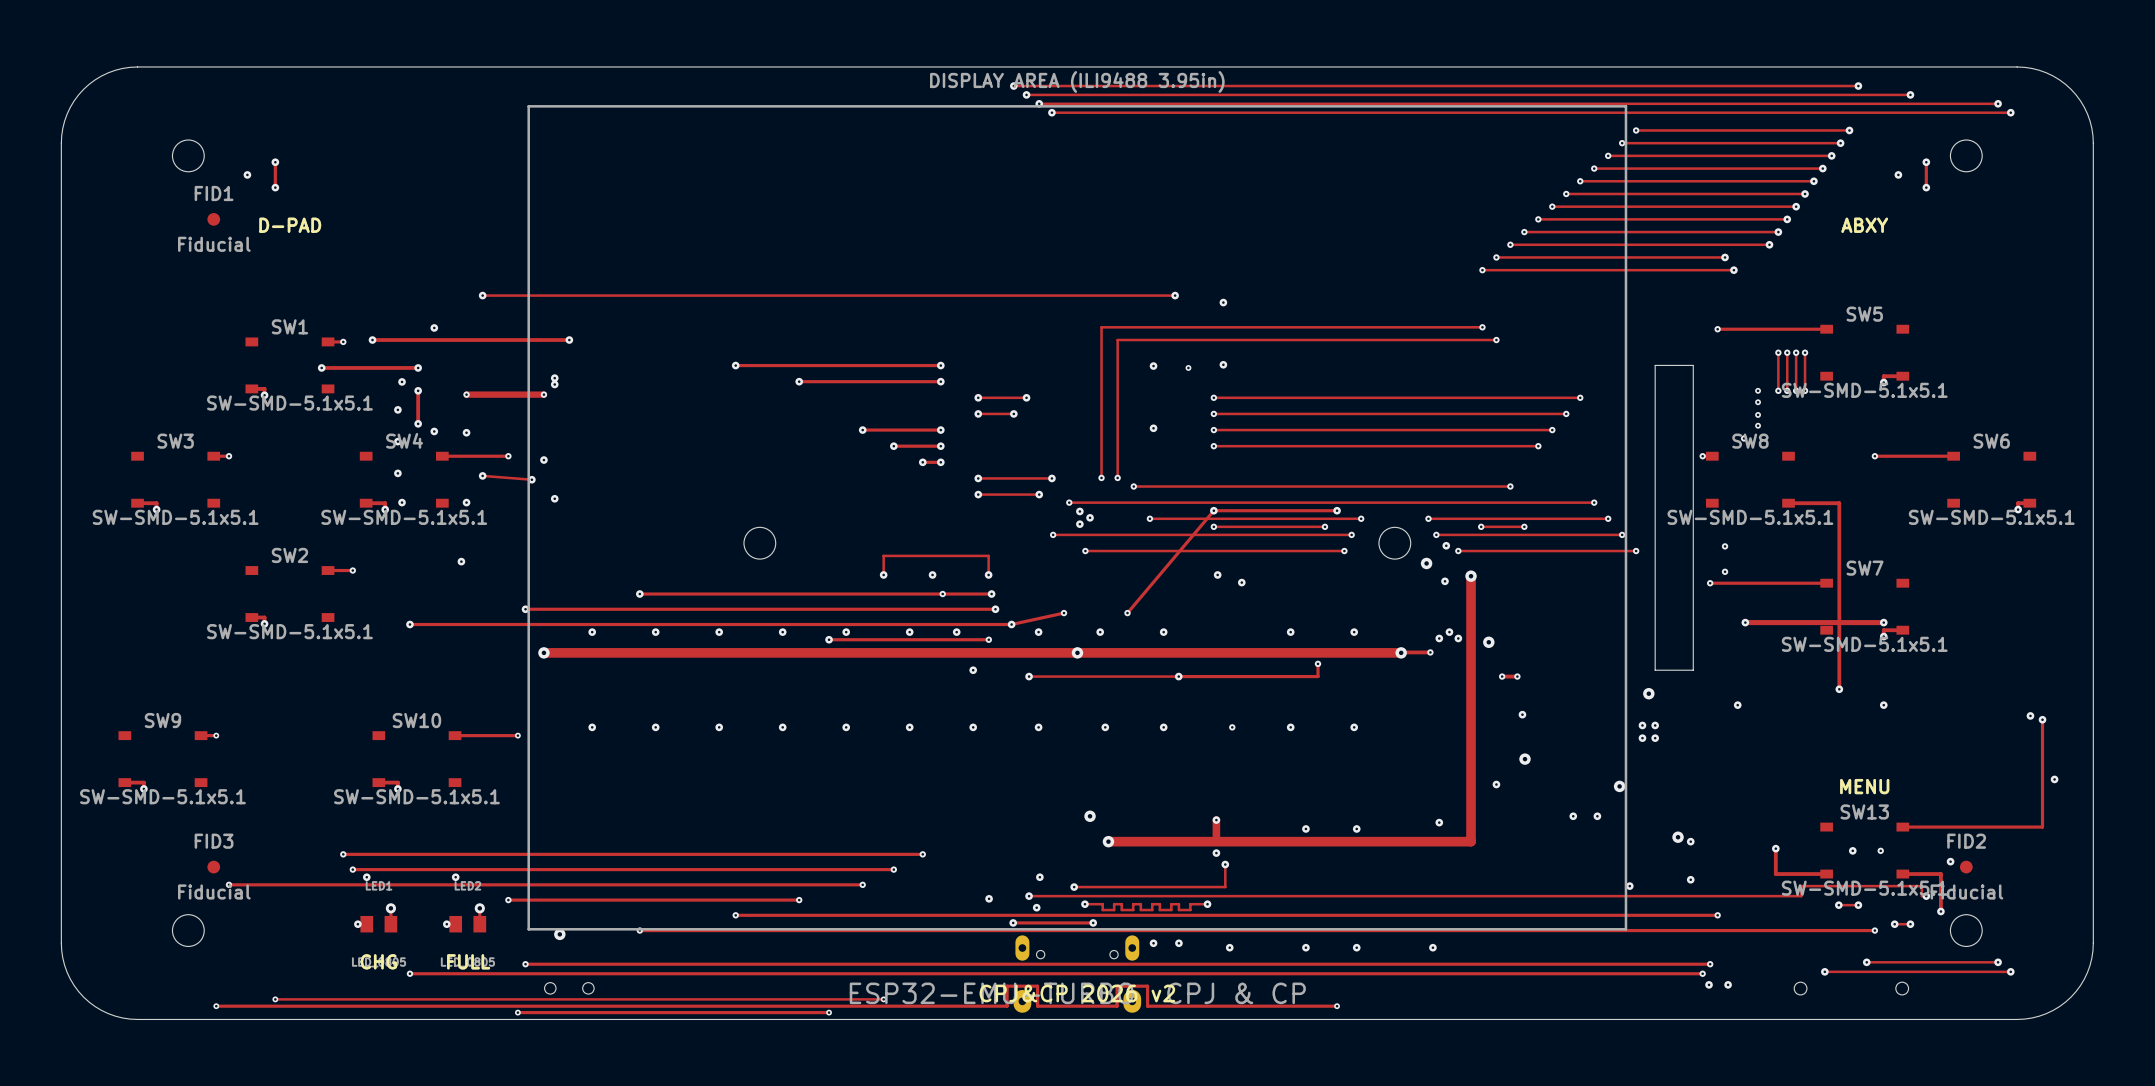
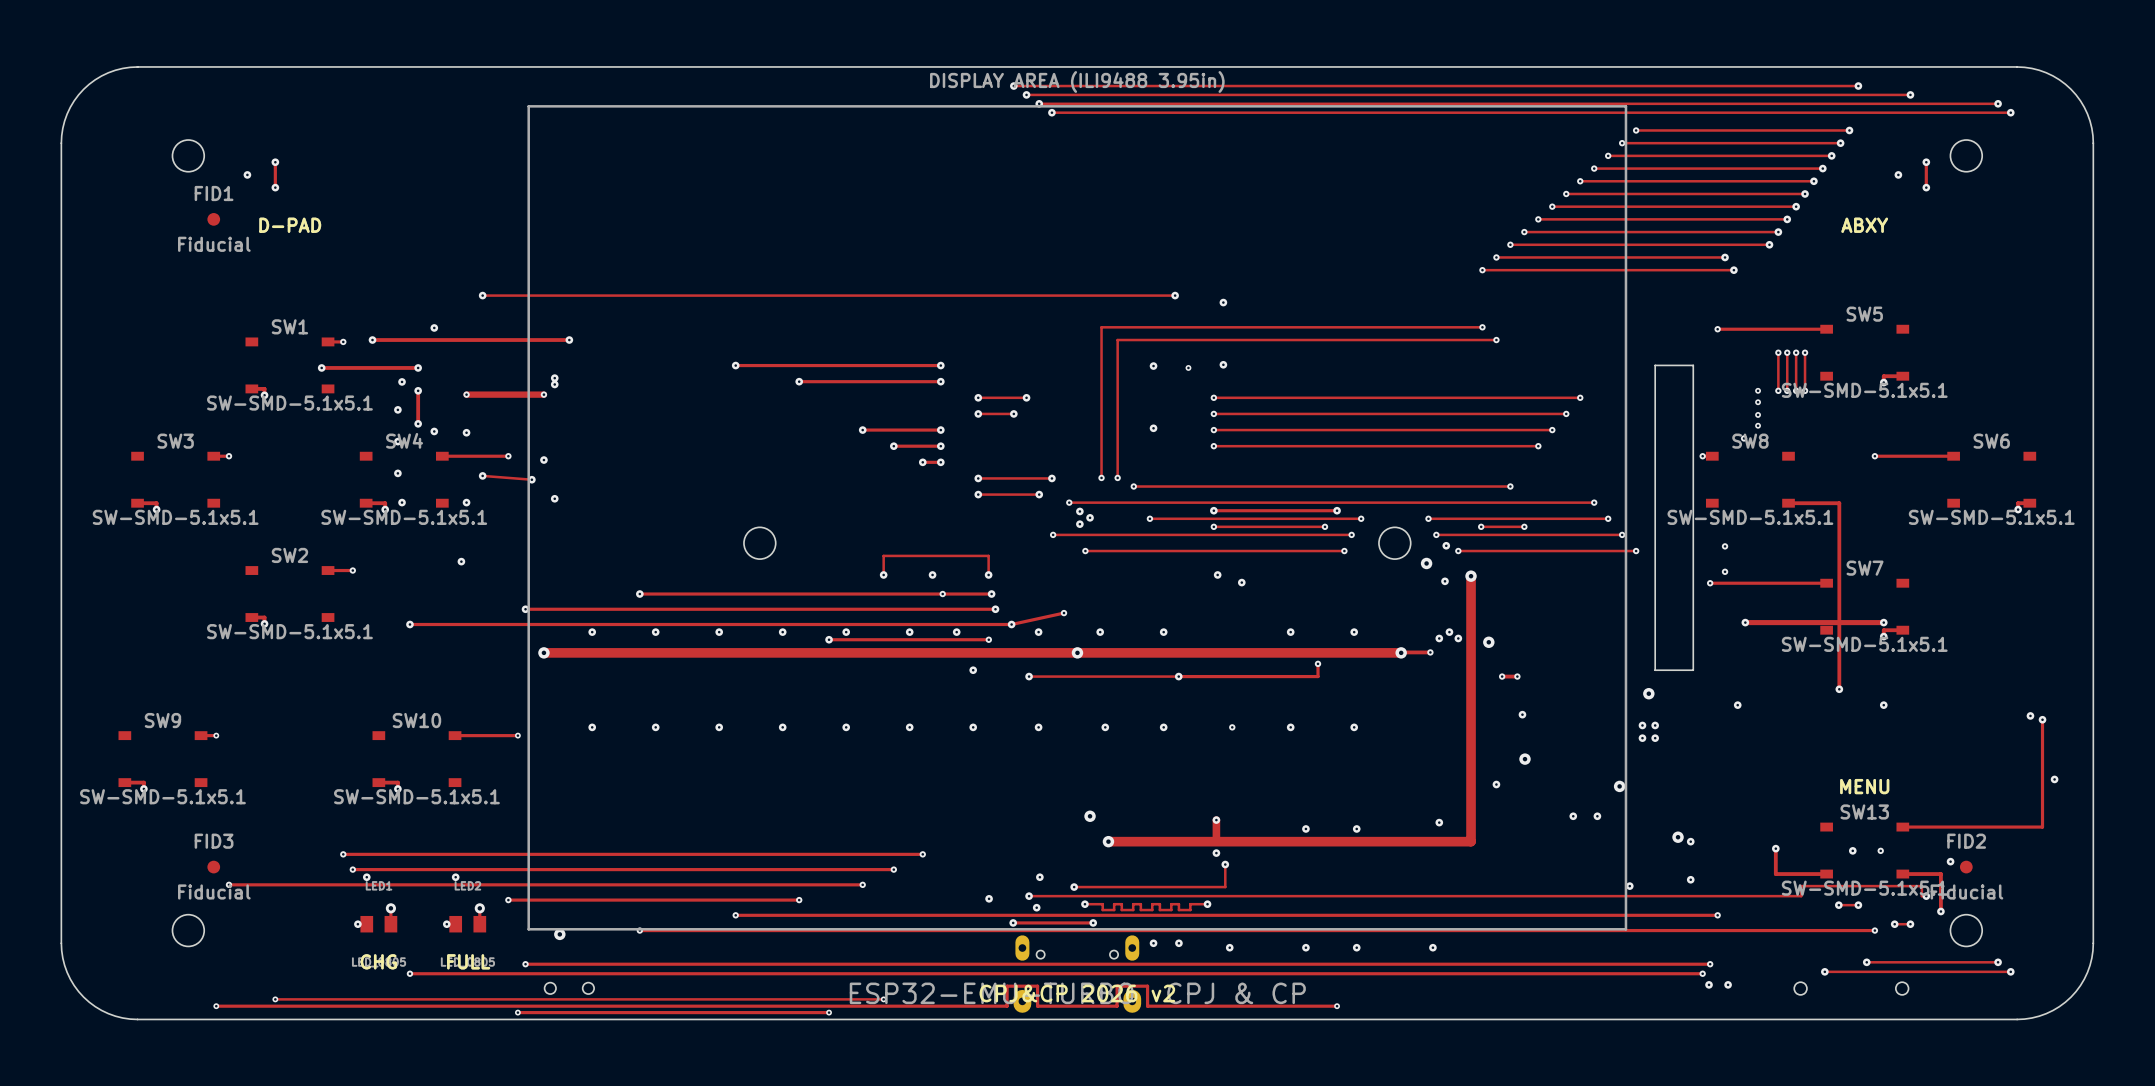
track: (1213, 510) (1127, 613) -> none
via: (1127, 613) -> none

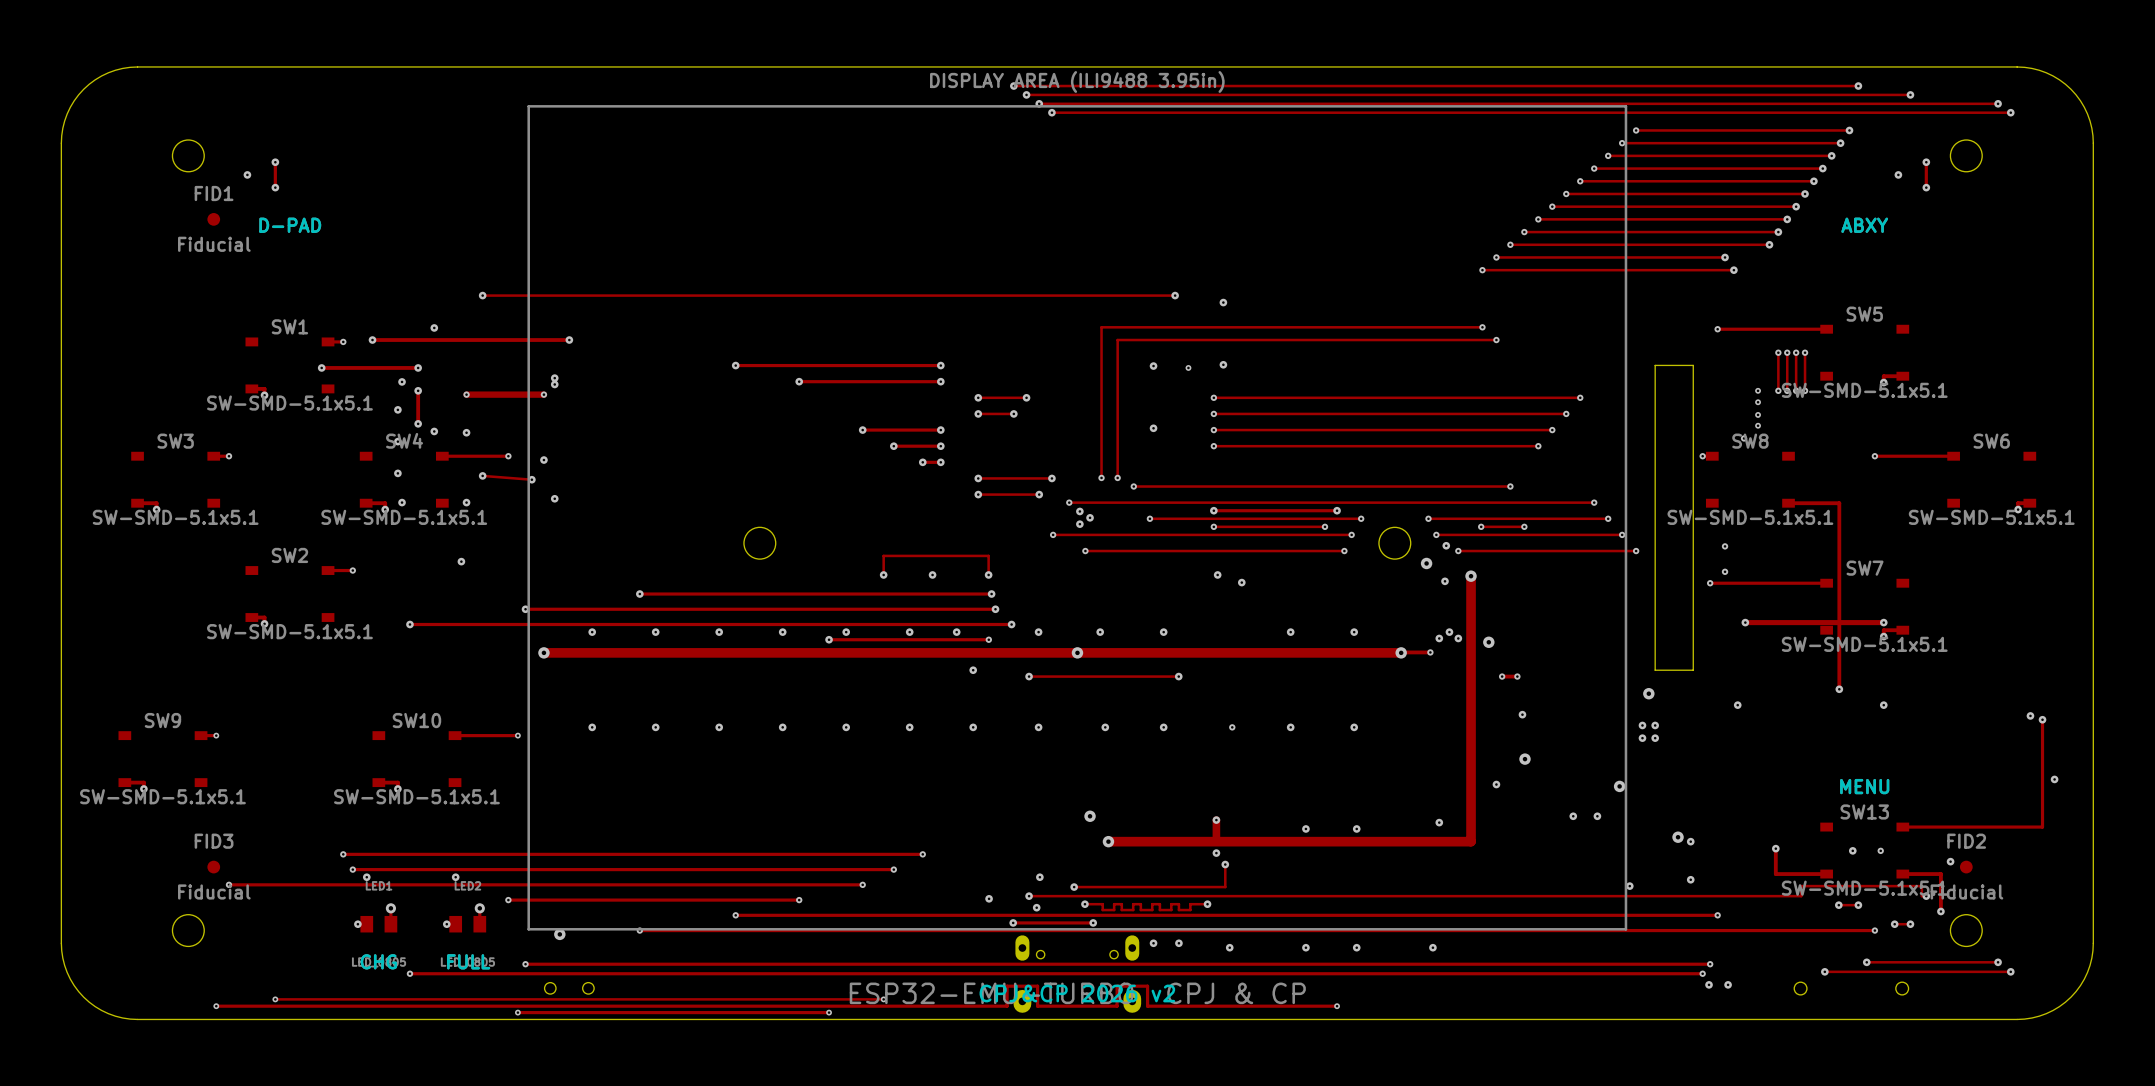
via: (942, 594) -> none
track: (1064, 613) (1011, 624) -> none
via: (1064, 613) -> none
track: (1318, 663) (1318, 676) (1178, 676) -> none
via: (1318, 663) -> none

